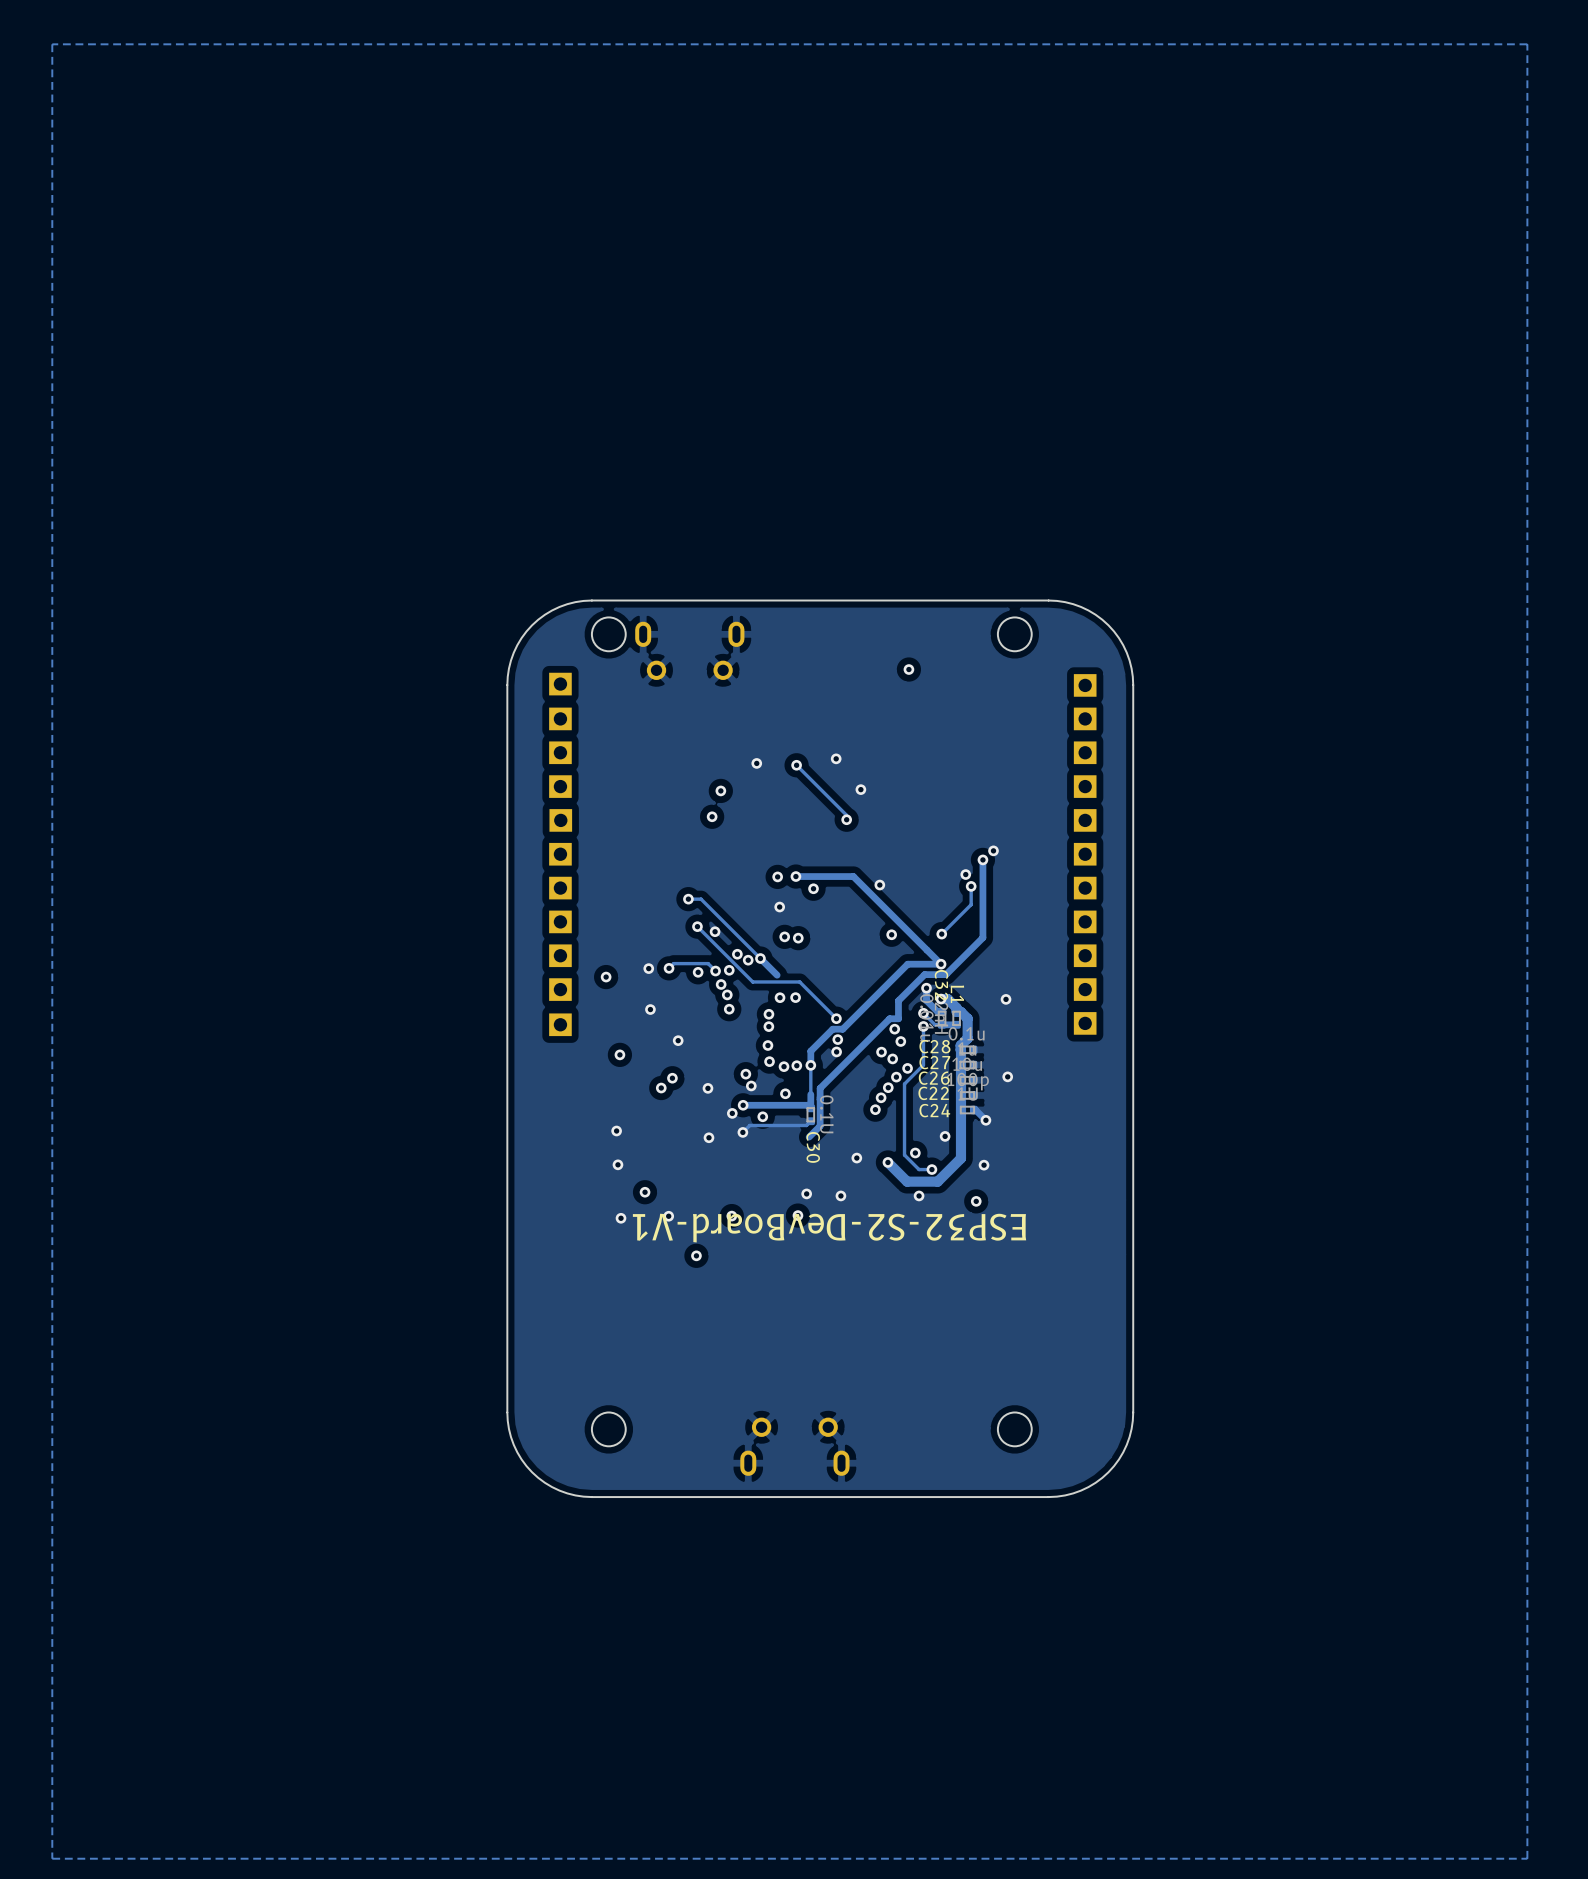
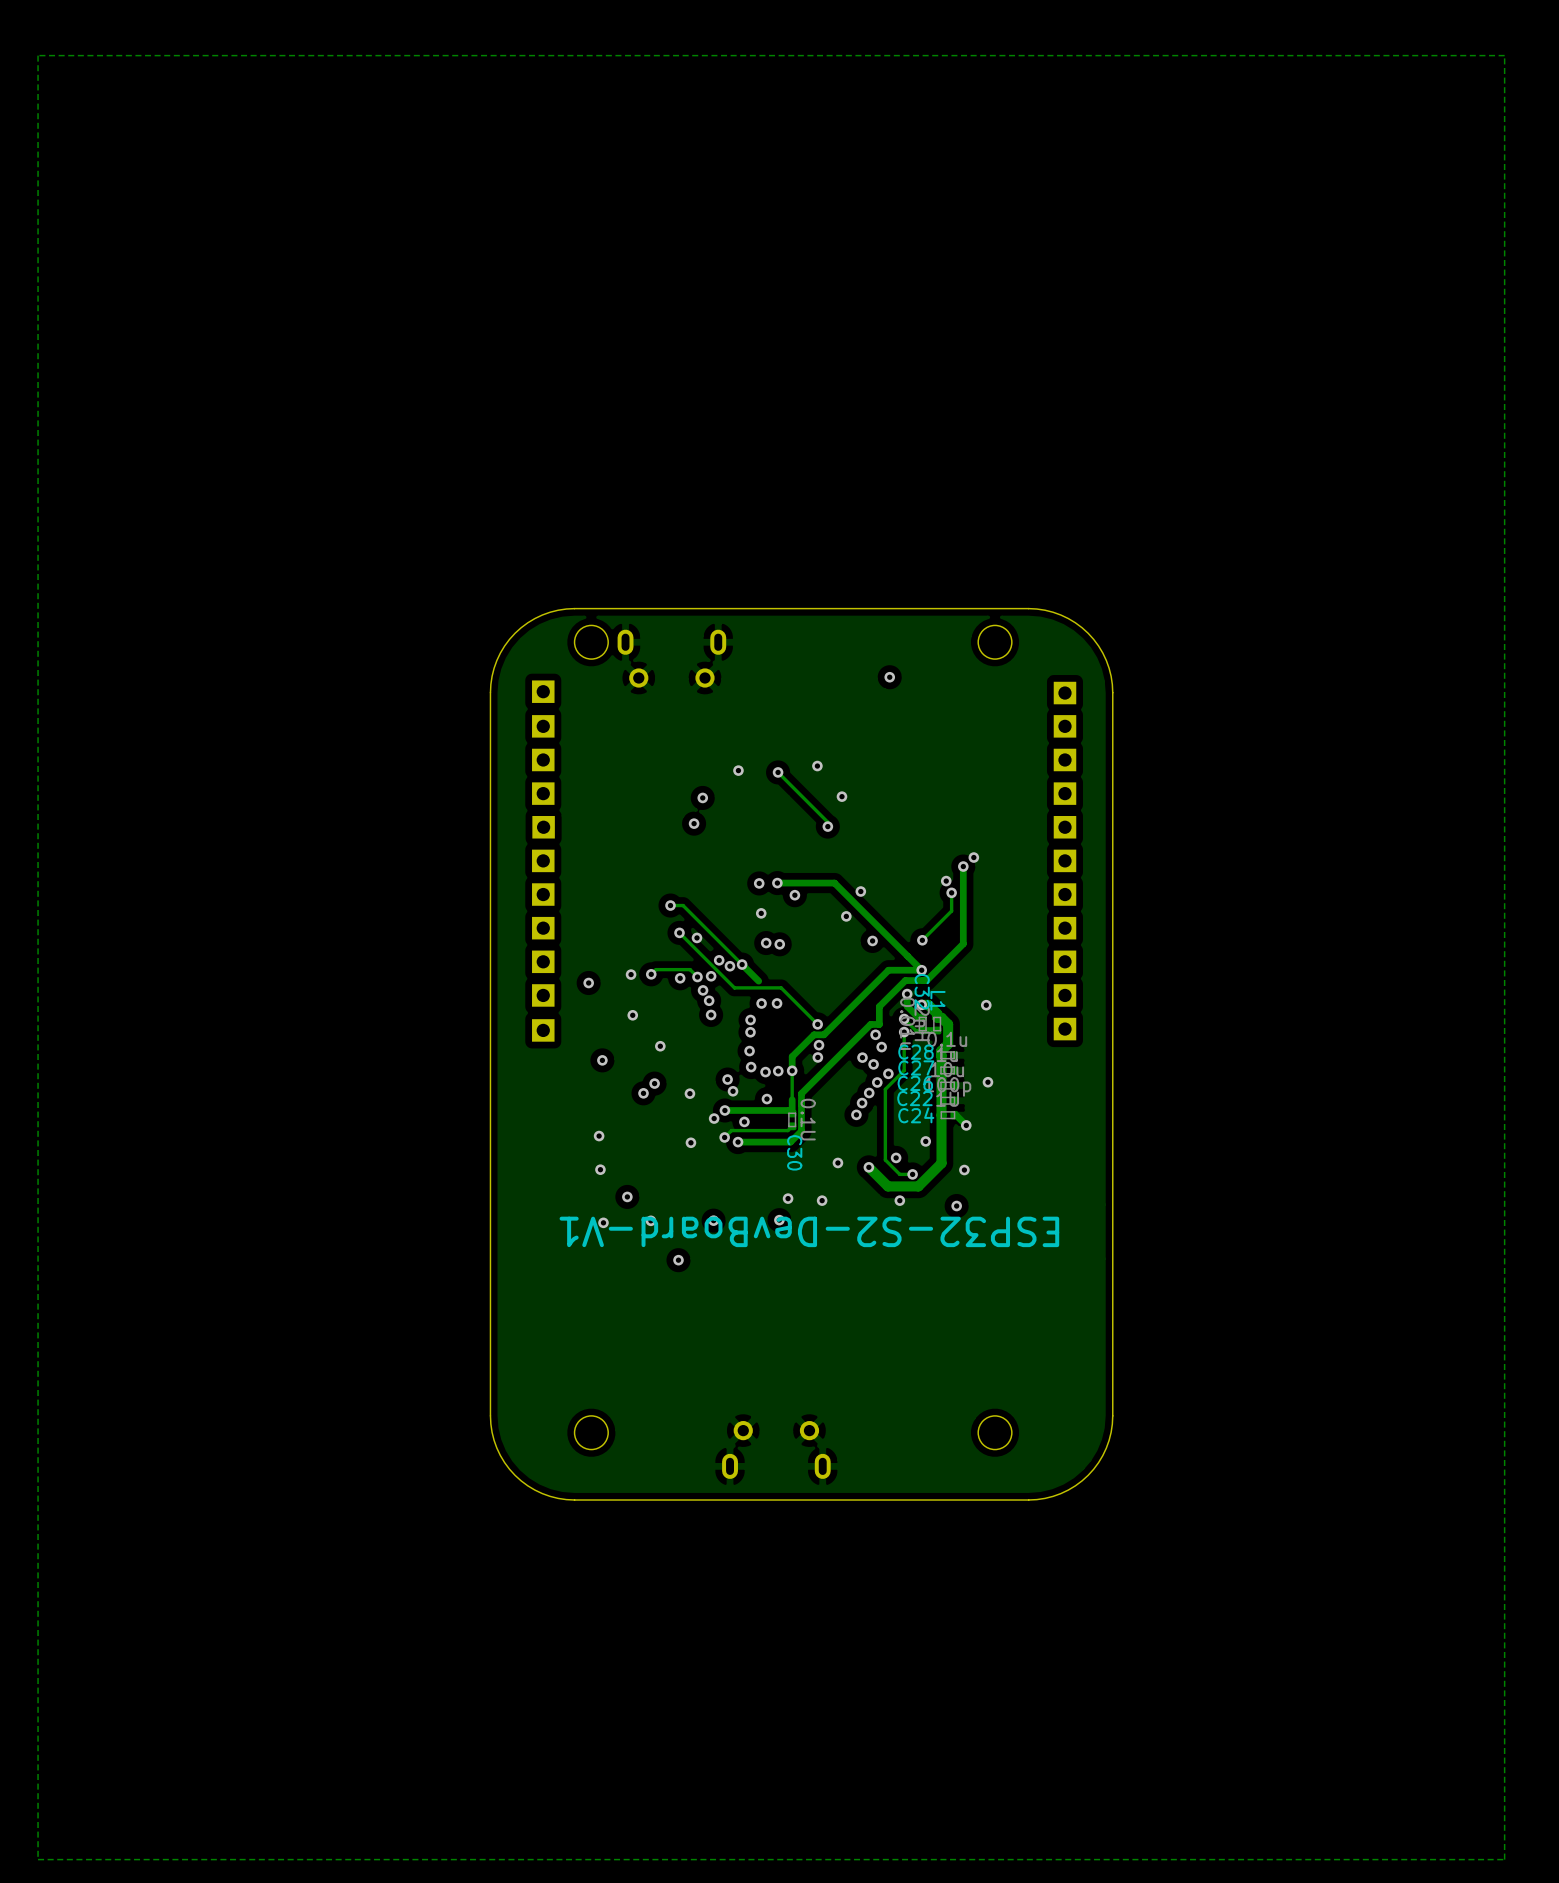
via: none -> (846, 916)
via: none -> (738, 1142)
track: none -> (790, 1142) (738, 1142)

